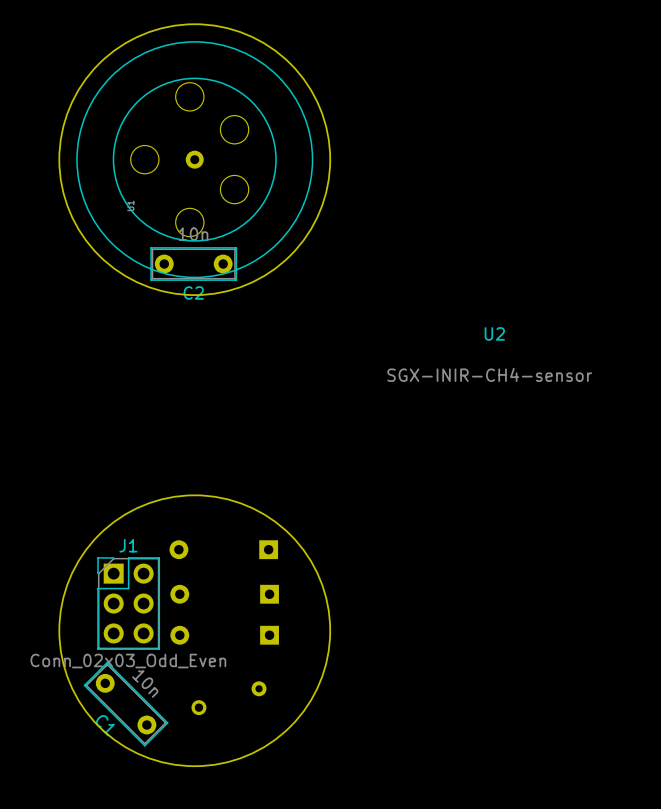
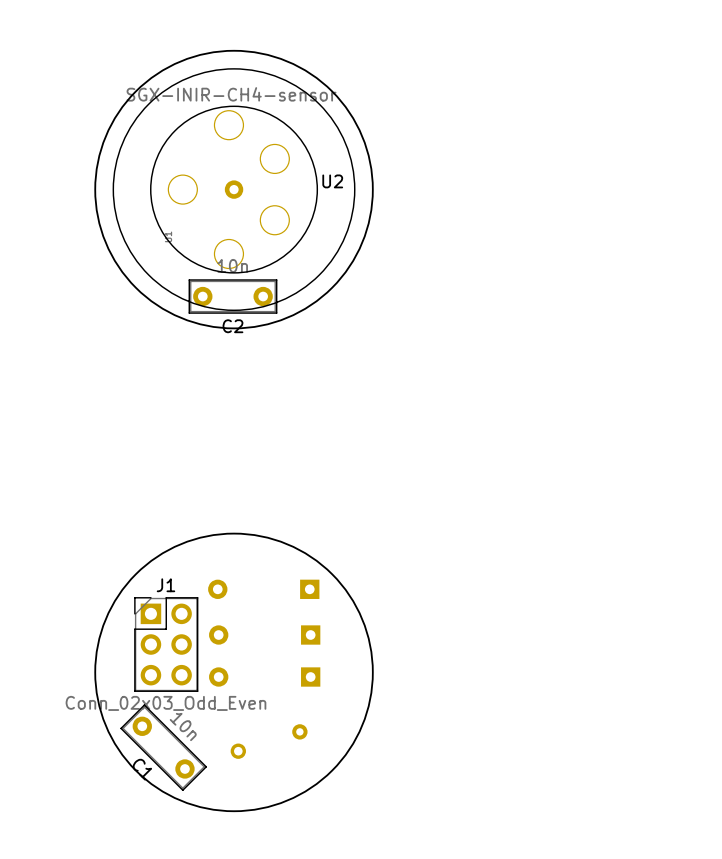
U2 name position: U2 (494, 333) -> U2 (332, 181)
U2 value position: SGX-INIR-CH4-sensor (489, 374) -> SGX-INIR-CH4-sensor (231, 94)

